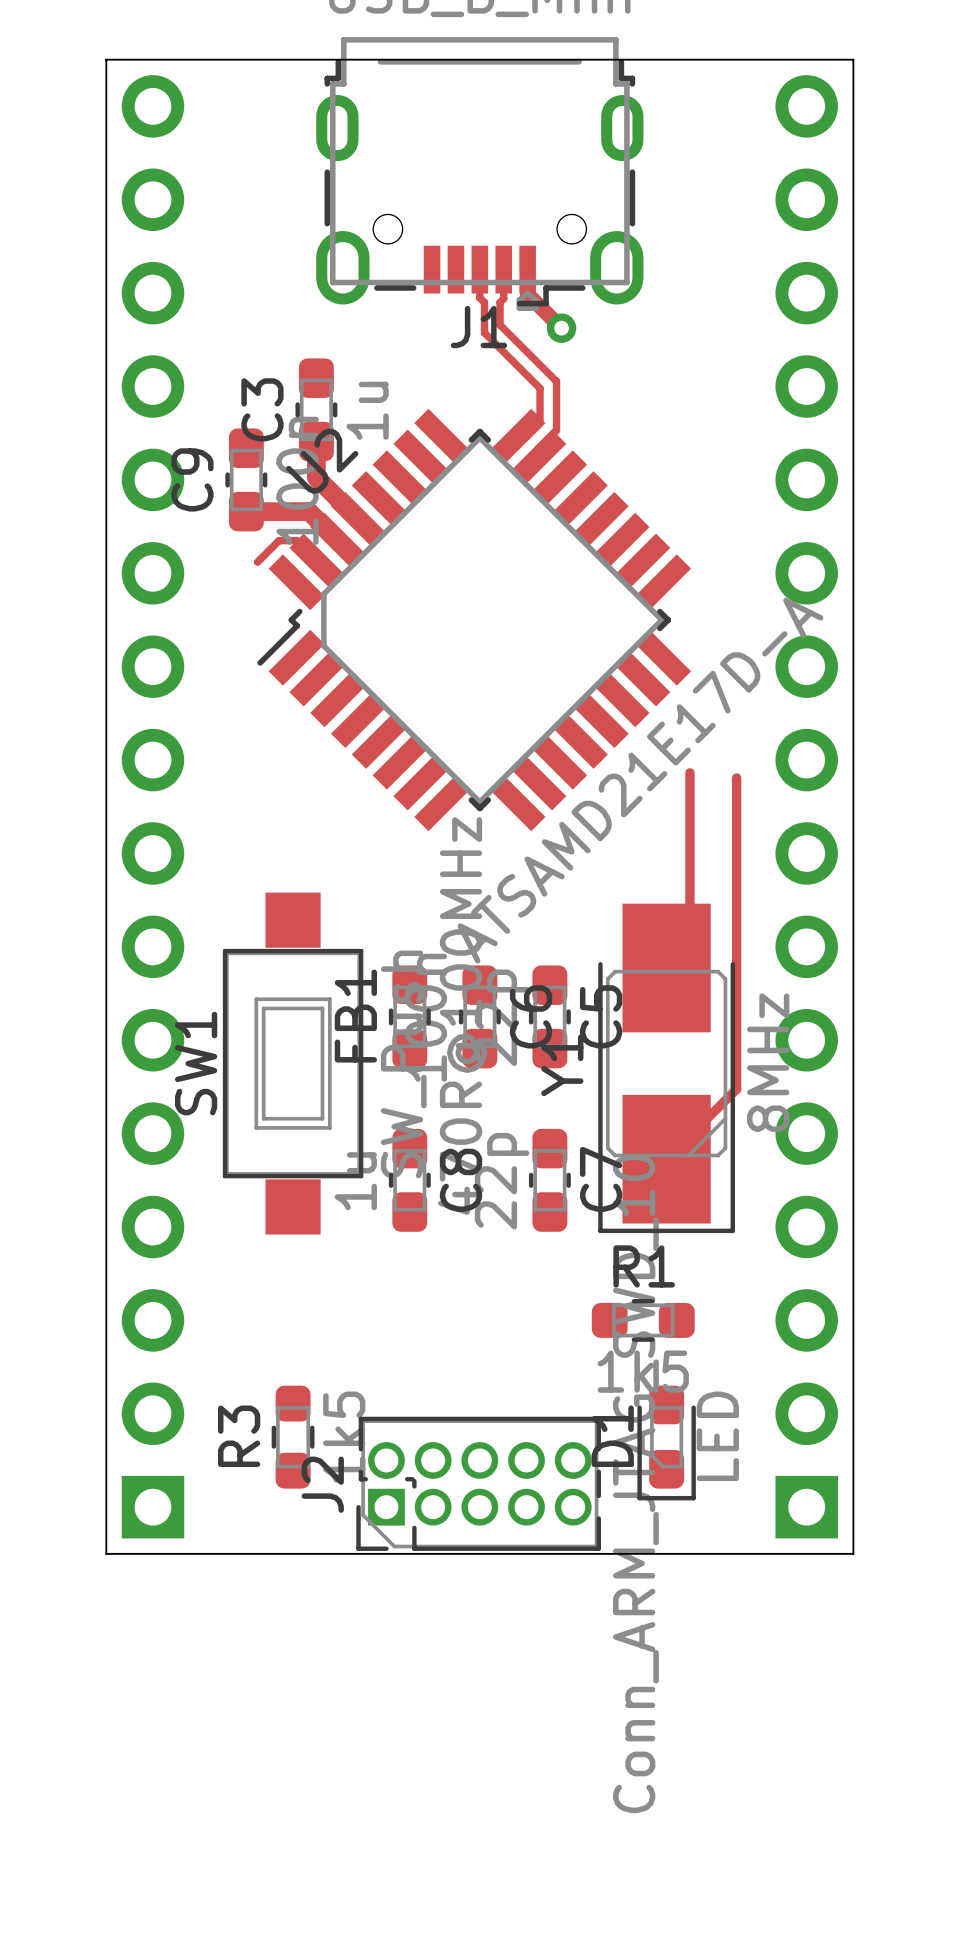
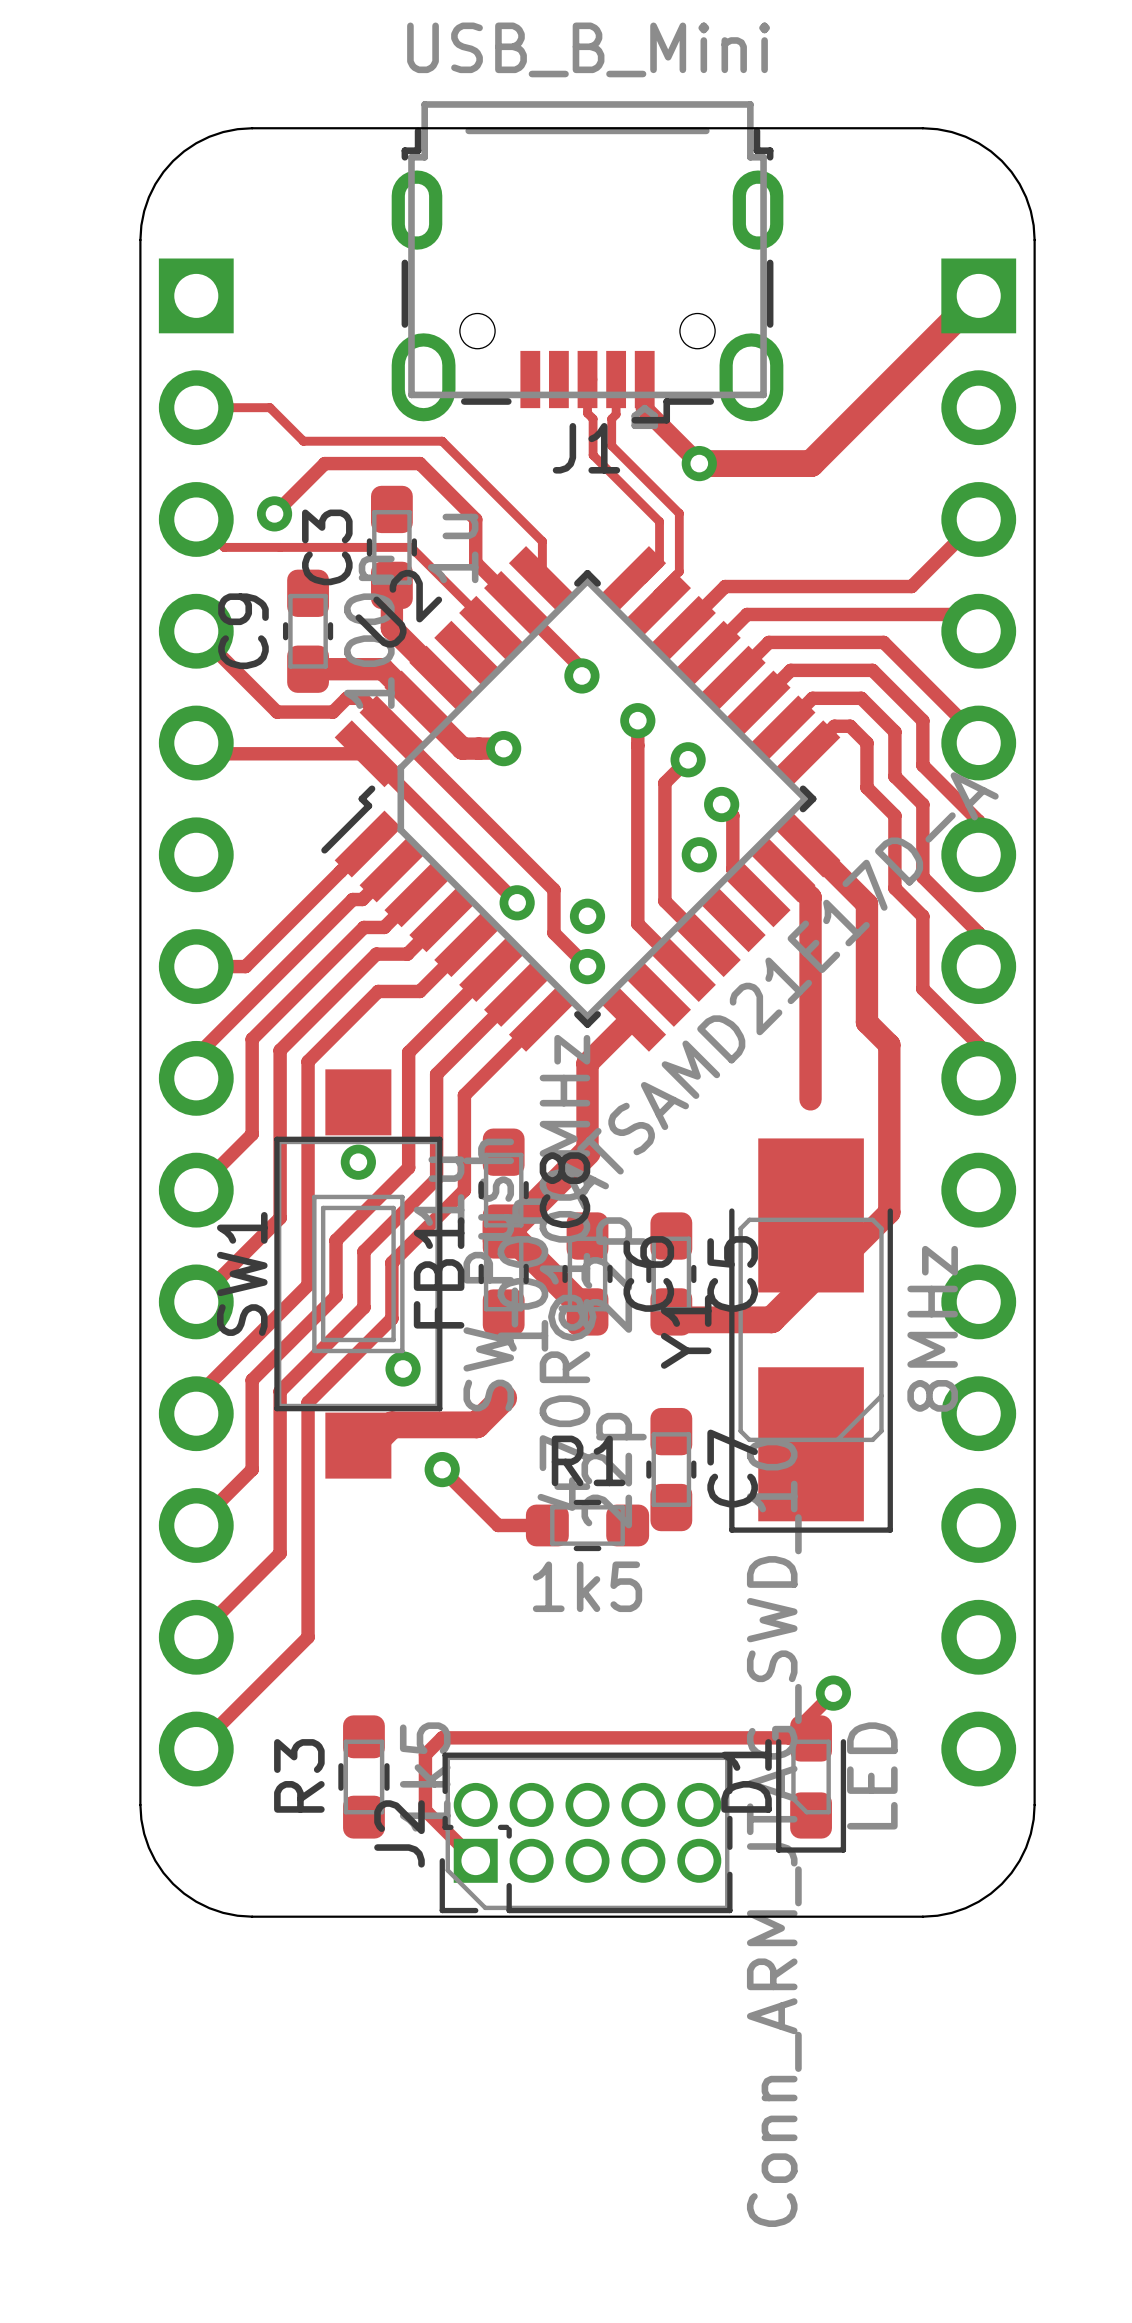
board edge: (199, 59) (106, 59) (106, 153) -> (252, 128) (223, 132) (209, 136) (184, 151) (173, 160) (155, 184) (148, 197) (141, 225) (140, 240)
board edge: (760, 59) (853, 59) (853, 153) -> (922, 128) (951, 132) (965, 136) (978, 143) (1001, 160) (1019, 184) (1026, 197) (1033, 225) (1034, 240)
part footprint: [121, 75, 185, 1539] -> [158, 258, 234, 1787]
part footprint: [775, 75, 838, 1539] -> [941, 258, 1017, 1787]
track: none -> (978, 295) (811, 463) (699, 463) (685, 449)
track: none -> (196, 407) (269, 407) (303, 441) (442, 441) (542, 541) (542, 579)
via position: (561, 328) -> (699, 463)
track: none -> (274, 513) (324, 463) (419, 463) (475, 519) (475, 562) (581, 668) (581, 675)
via: none -> (274, 513)
track: none -> (978, 519) (911, 586) (725, 586) (682, 629)
track: none -> (208, 532) (224, 547) (411, 547) (492, 628)
track: none -> (978, 631) (961, 614) (747, 614) (707, 654)
via: none -> (581, 675)
track: none -> (732, 679) (768, 642) (883, 642) (978, 737) (978, 743)
track: (296, 540) (279, 540) (257, 562) -> (368, 703) (362, 698) (346, 698) (332, 712) (277, 712) (196, 631)
track: none -> (417, 704) (462, 748) (503, 748)
track: none -> (757, 704) (790, 670) (872, 670) (922, 720) (922, 765) (978, 821) (978, 854)
track: none -> (637, 720) (637, 923) (682, 968)
via: none -> (637, 720)
track: none -> (393, 728) (553, 889) (553, 933) (587, 966)
track: none -> (782, 728) (812, 698) (861, 698) (894, 731) (894, 776) (922, 804) (922, 877) (978, 933) (978, 966)
track: none -> (196, 743) (207, 753) (368, 753) (517, 902)
via: none -> (503, 748)
track: none -> (806, 753) (834, 726) (850, 726) (866, 743) (866, 787) (894, 815) (894, 888) (922, 916) (922, 988) (978, 1044) (978, 1078)
track: none -> (688, 759) (664, 782) (664, 901) (707, 943)
via: none -> (688, 759)
track: none -> (721, 804) (732, 815) (732, 869) (757, 893)
via: none -> (721, 804)
track: none -> (368, 844) (245, 966) (196, 966)
track: none -> (806, 844) (866, 904) (866, 1022) (889, 1044) (889, 1212) (821, 1280) (811, 1280) (771, 1319) (671, 1319)
via: none -> (699, 854)
track: none -> (393, 868) (362, 899) (352, 899) (196, 1056) (196, 1078)
track: none -> (782, 868) (810, 897) (810, 1099)
track: none -> (417, 893) (384, 927) (363, 927) (252, 1039) (252, 1134) (196, 1190)
via: none -> (517, 902)
via: none -> (587, 916)
track: none -> (442, 918) (407, 954) (376, 954) (280, 1050) (280, 1218) (196, 1301)
track: none -> (467, 943) (419, 991) (378, 991) (308, 1061) (308, 1285) (196, 1396) (196, 1413)
via: none -> (587, 966)
track: none -> (492, 968) (408, 1052) (408, 1167) (336, 1240) (336, 1296) (252, 1380) (252, 1469) (196, 1525)
track: (689, 772) (689, 944) (666, 967) -> none
track: (736, 777) (736, 1089) (666, 1159) -> none
track: none -> (517, 993) (436, 1074) (436, 1178) (363, 1251) (363, 1307) (280, 1391) (280, 1553) (196, 1637)
track: none -> (542, 1018) (464, 1095) (464, 1190) (391, 1262) (391, 1318) (308, 1402) (308, 1637) (196, 1749)
track: none -> (632, 1018) (587, 1063) (587, 1152) (511, 1228) (503, 1228) (587, 1311) (587, 1319)
via: none -> (358, 1162)
SW1 position: (293, 1063) -> (358, 1273)
via: none -> (403, 1368)
track: none -> (503, 1397) (476, 1424) (391, 1424) (371, 1445) (358, 1445)
track: none -> (442, 1469) (498, 1525) (547, 1525)
via: none -> (442, 1469)
C8 position: (409, 1180) -> (503, 1190)
R1 position: (643, 1320) -> (587, 1525)
track: none -> (833, 1693) (788, 1737) (442, 1737) (425, 1754) (425, 1810) (475, 1860)
via: none -> (833, 1693)
board edge: (106, 1460) (106, 1553) (199, 1553) -> (140, 1804) (141, 1819) (148, 1847) (155, 1860) (173, 1883) (196, 1901) (209, 1908) (223, 1912) (252, 1916)
board edge: (853, 1460) (853, 1553) (760, 1553) -> (1034, 1804) (1030, 1833) (1026, 1847) (1011, 1872) (1001, 1883) (978, 1901) (965, 1908) (951, 1912) (922, 1916)

